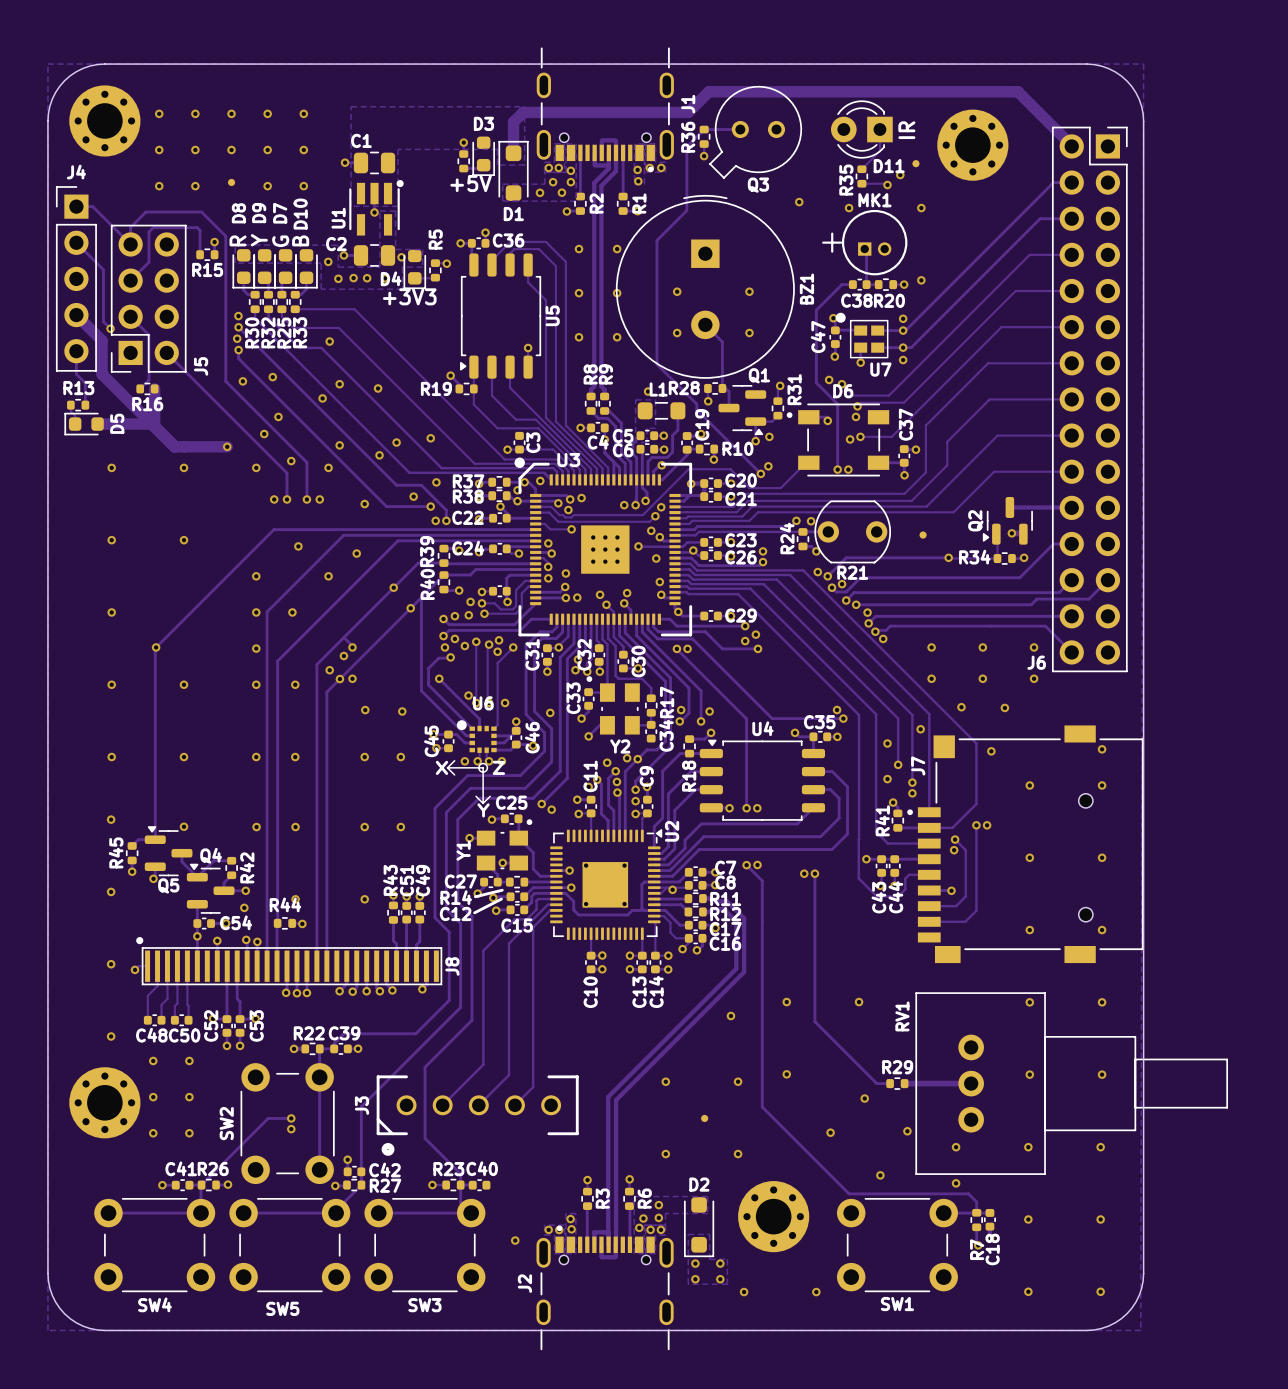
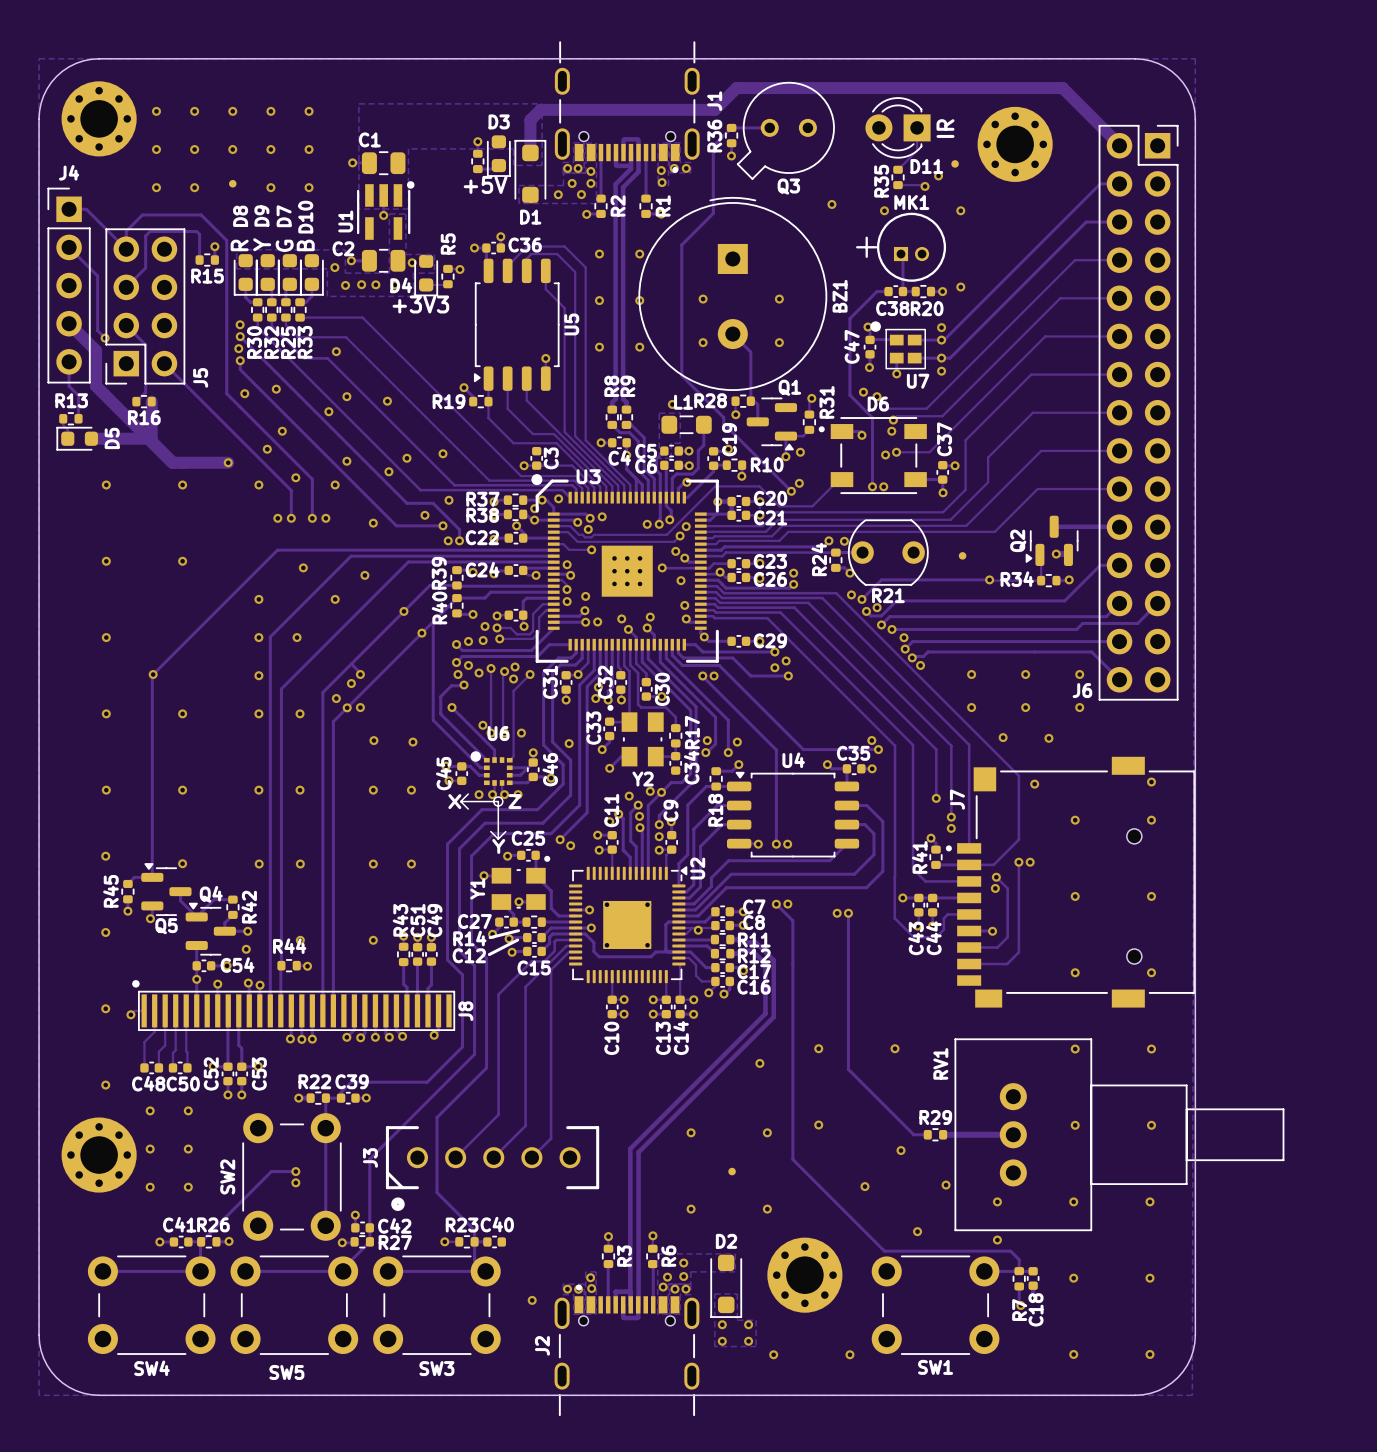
via: (920, 729) -> none
via: (887, 743) -> none
via: (887, 779) -> none

